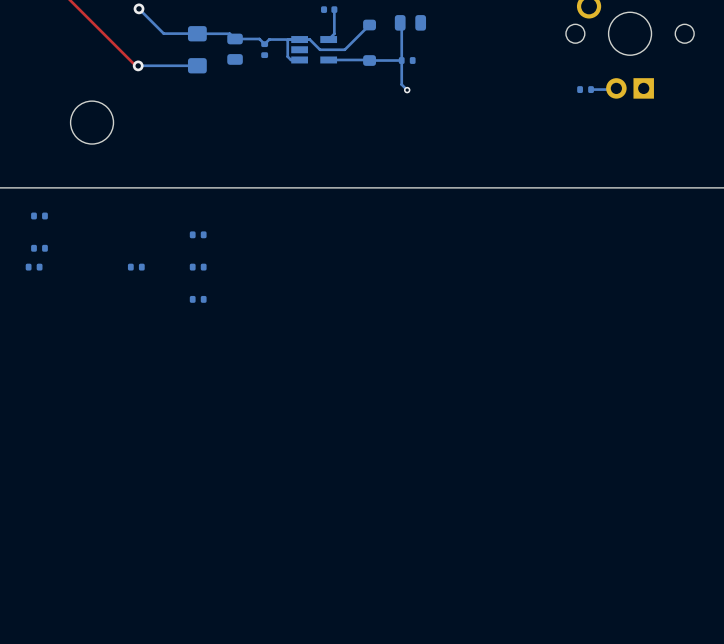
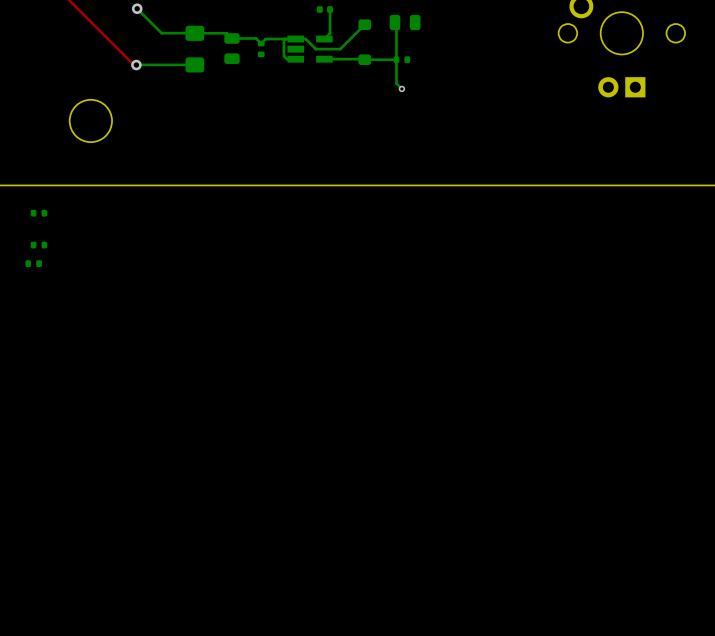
bottom track: (616, 88) (591, 89) -> none
part: (585, 89) -> none
part: (198, 234) -> none
part: (136, 267) -> none
part: (198, 267) -> none
part: (198, 299) -> none

